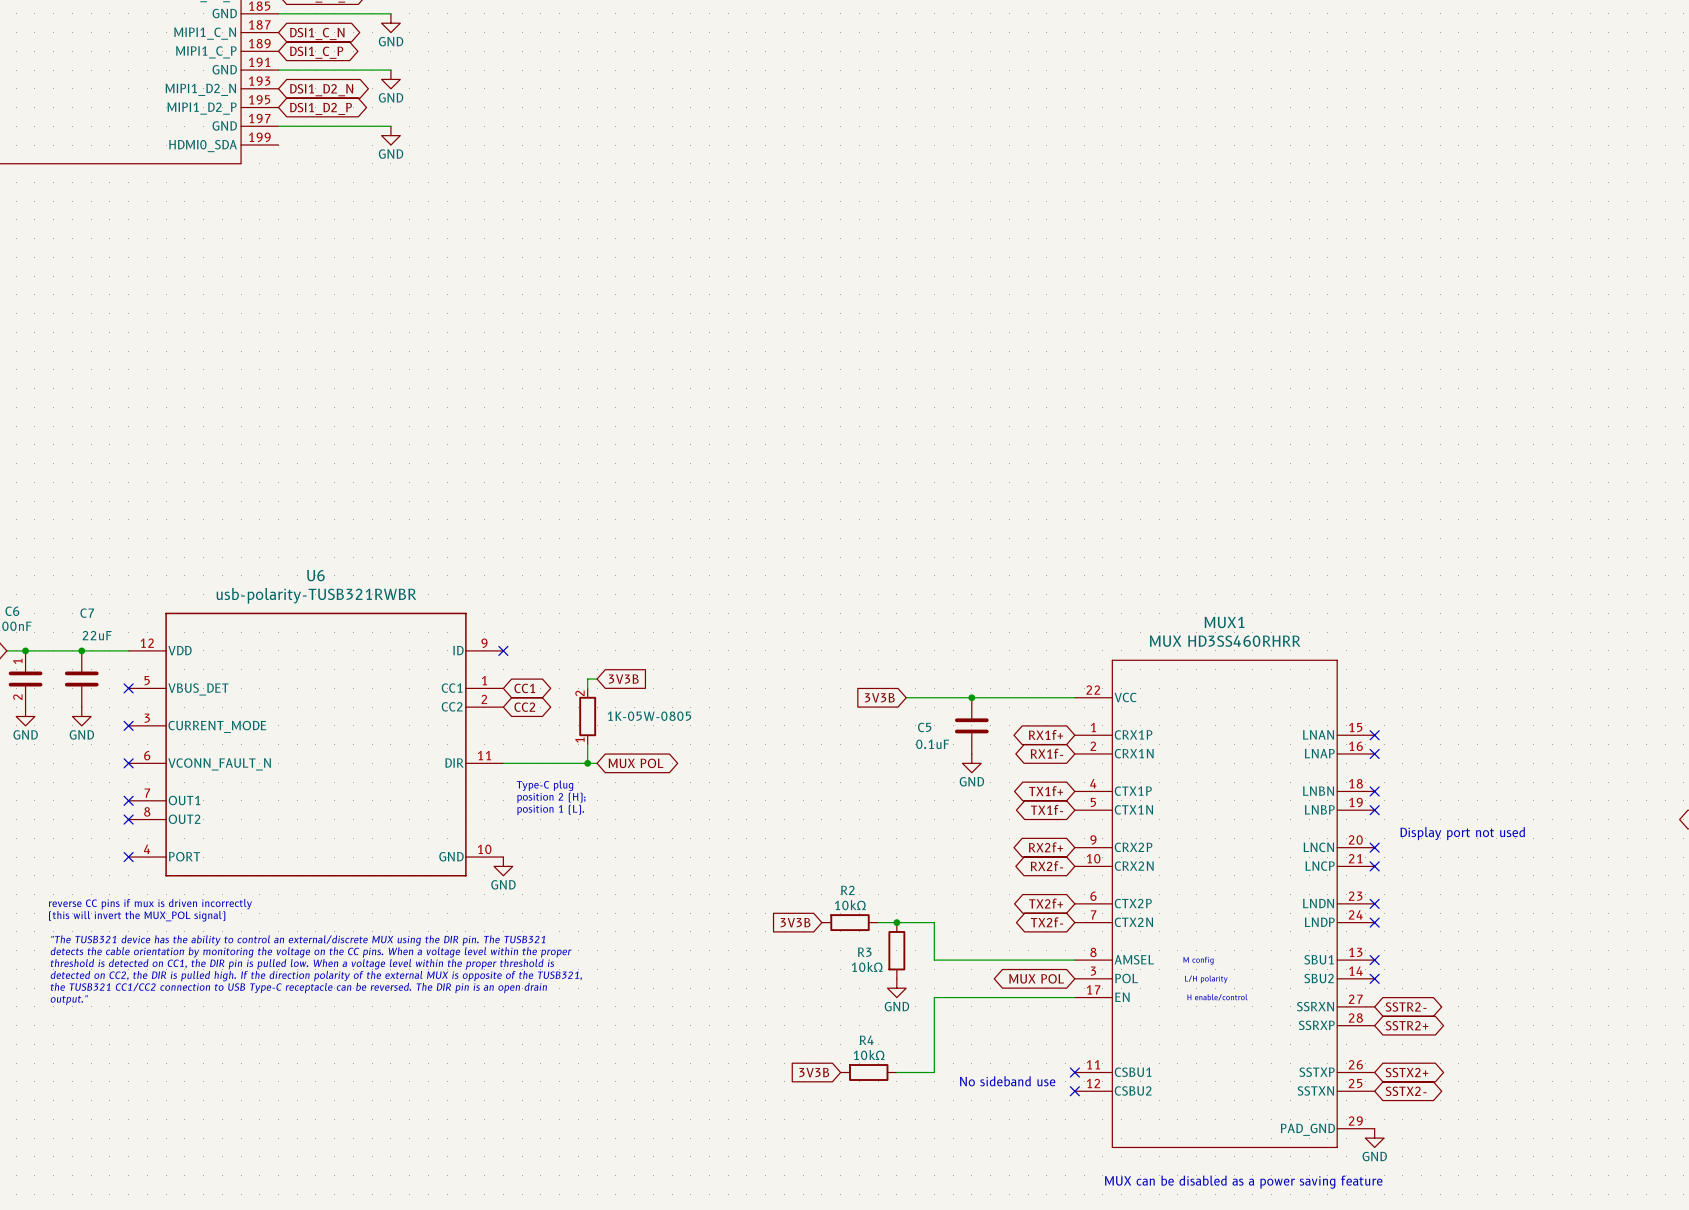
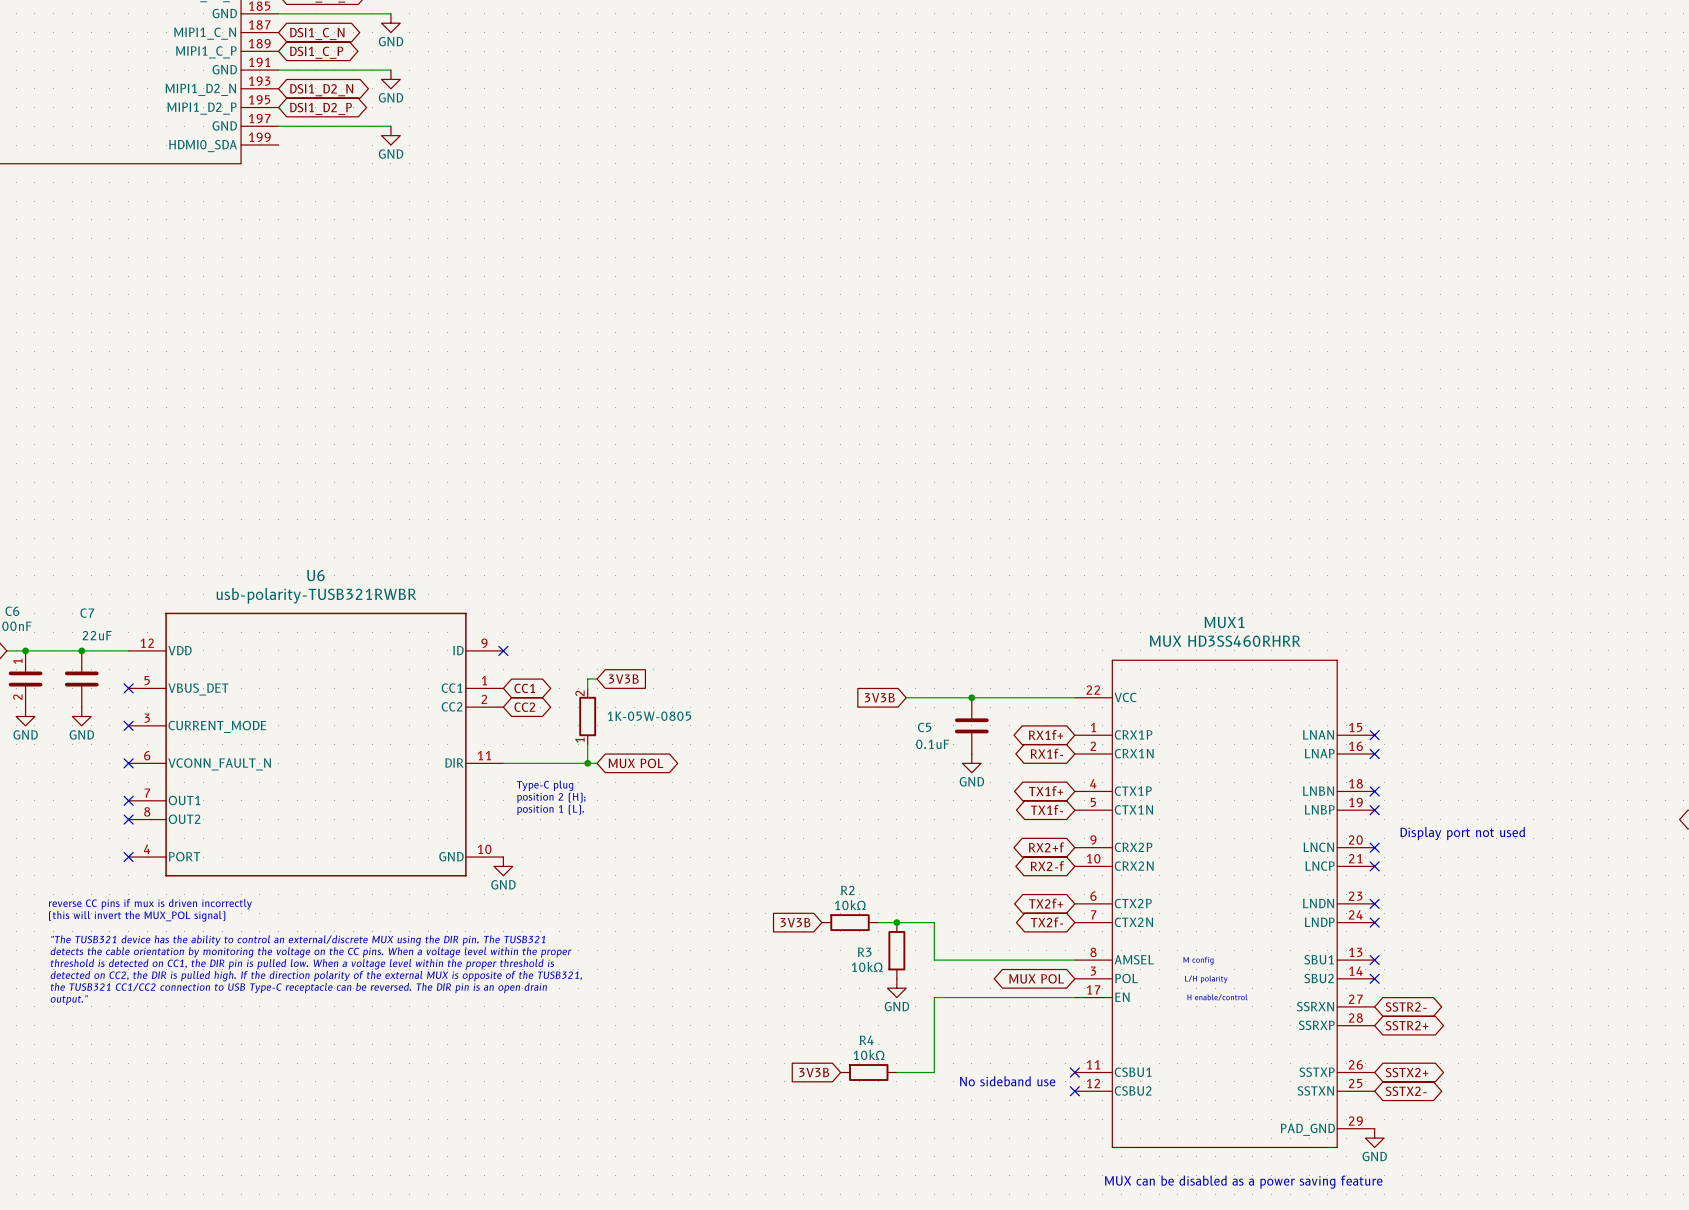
global label: RX2f+ (1046, 847) -> RX2+f (1046, 847)
global label: RX2f- (1046, 866) -> RX2-f (1047, 866)

